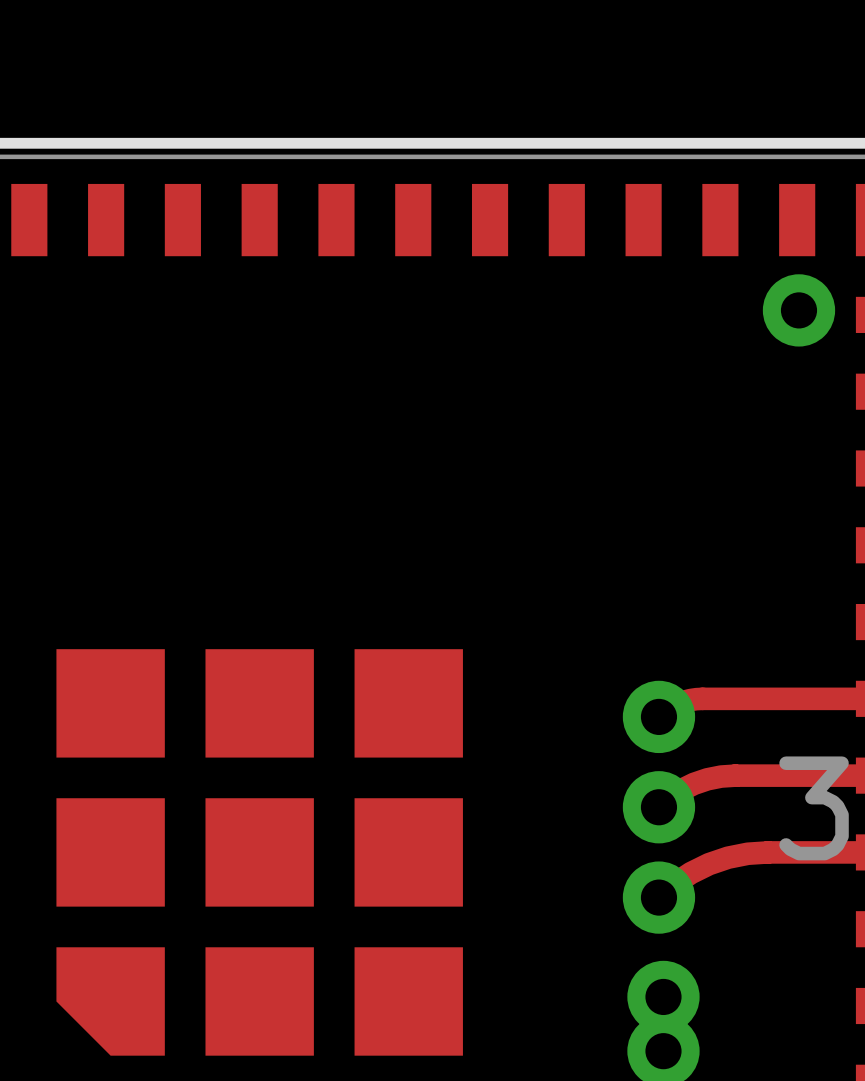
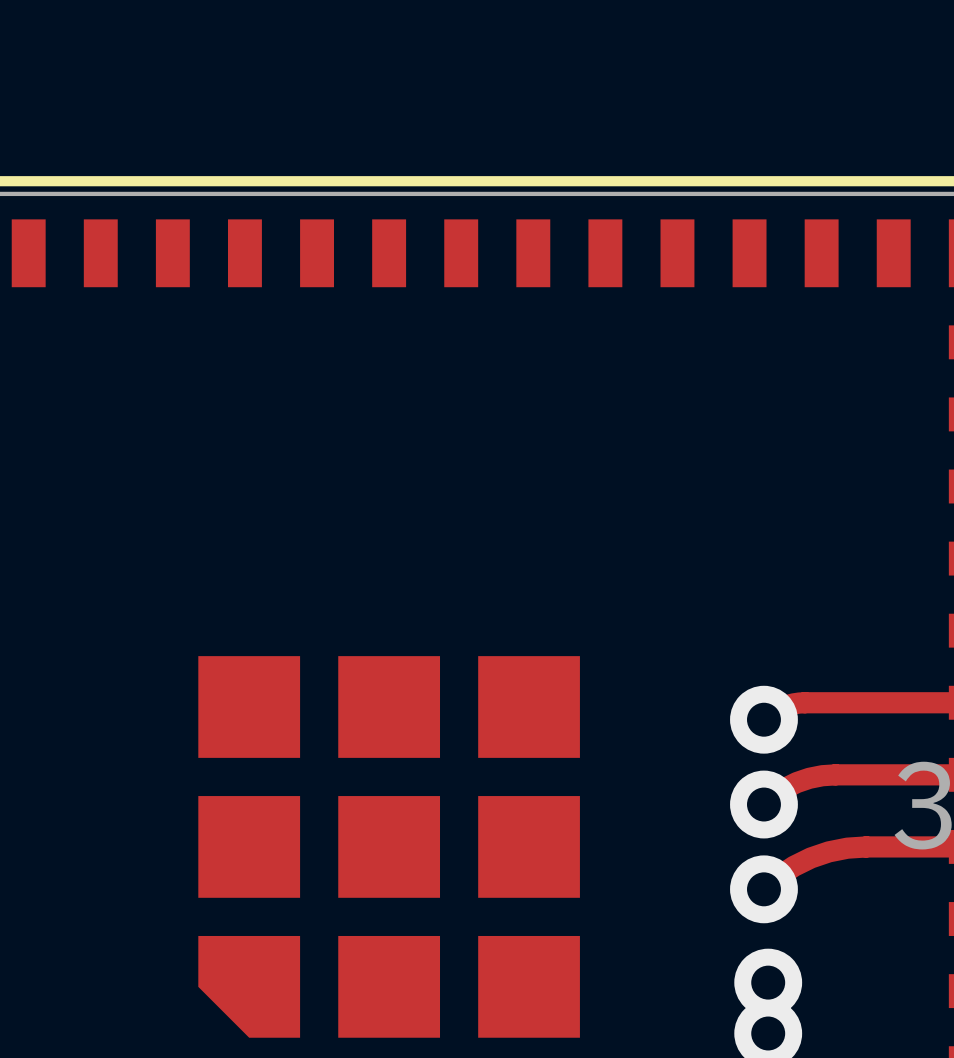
via: (798, 310) -> none

